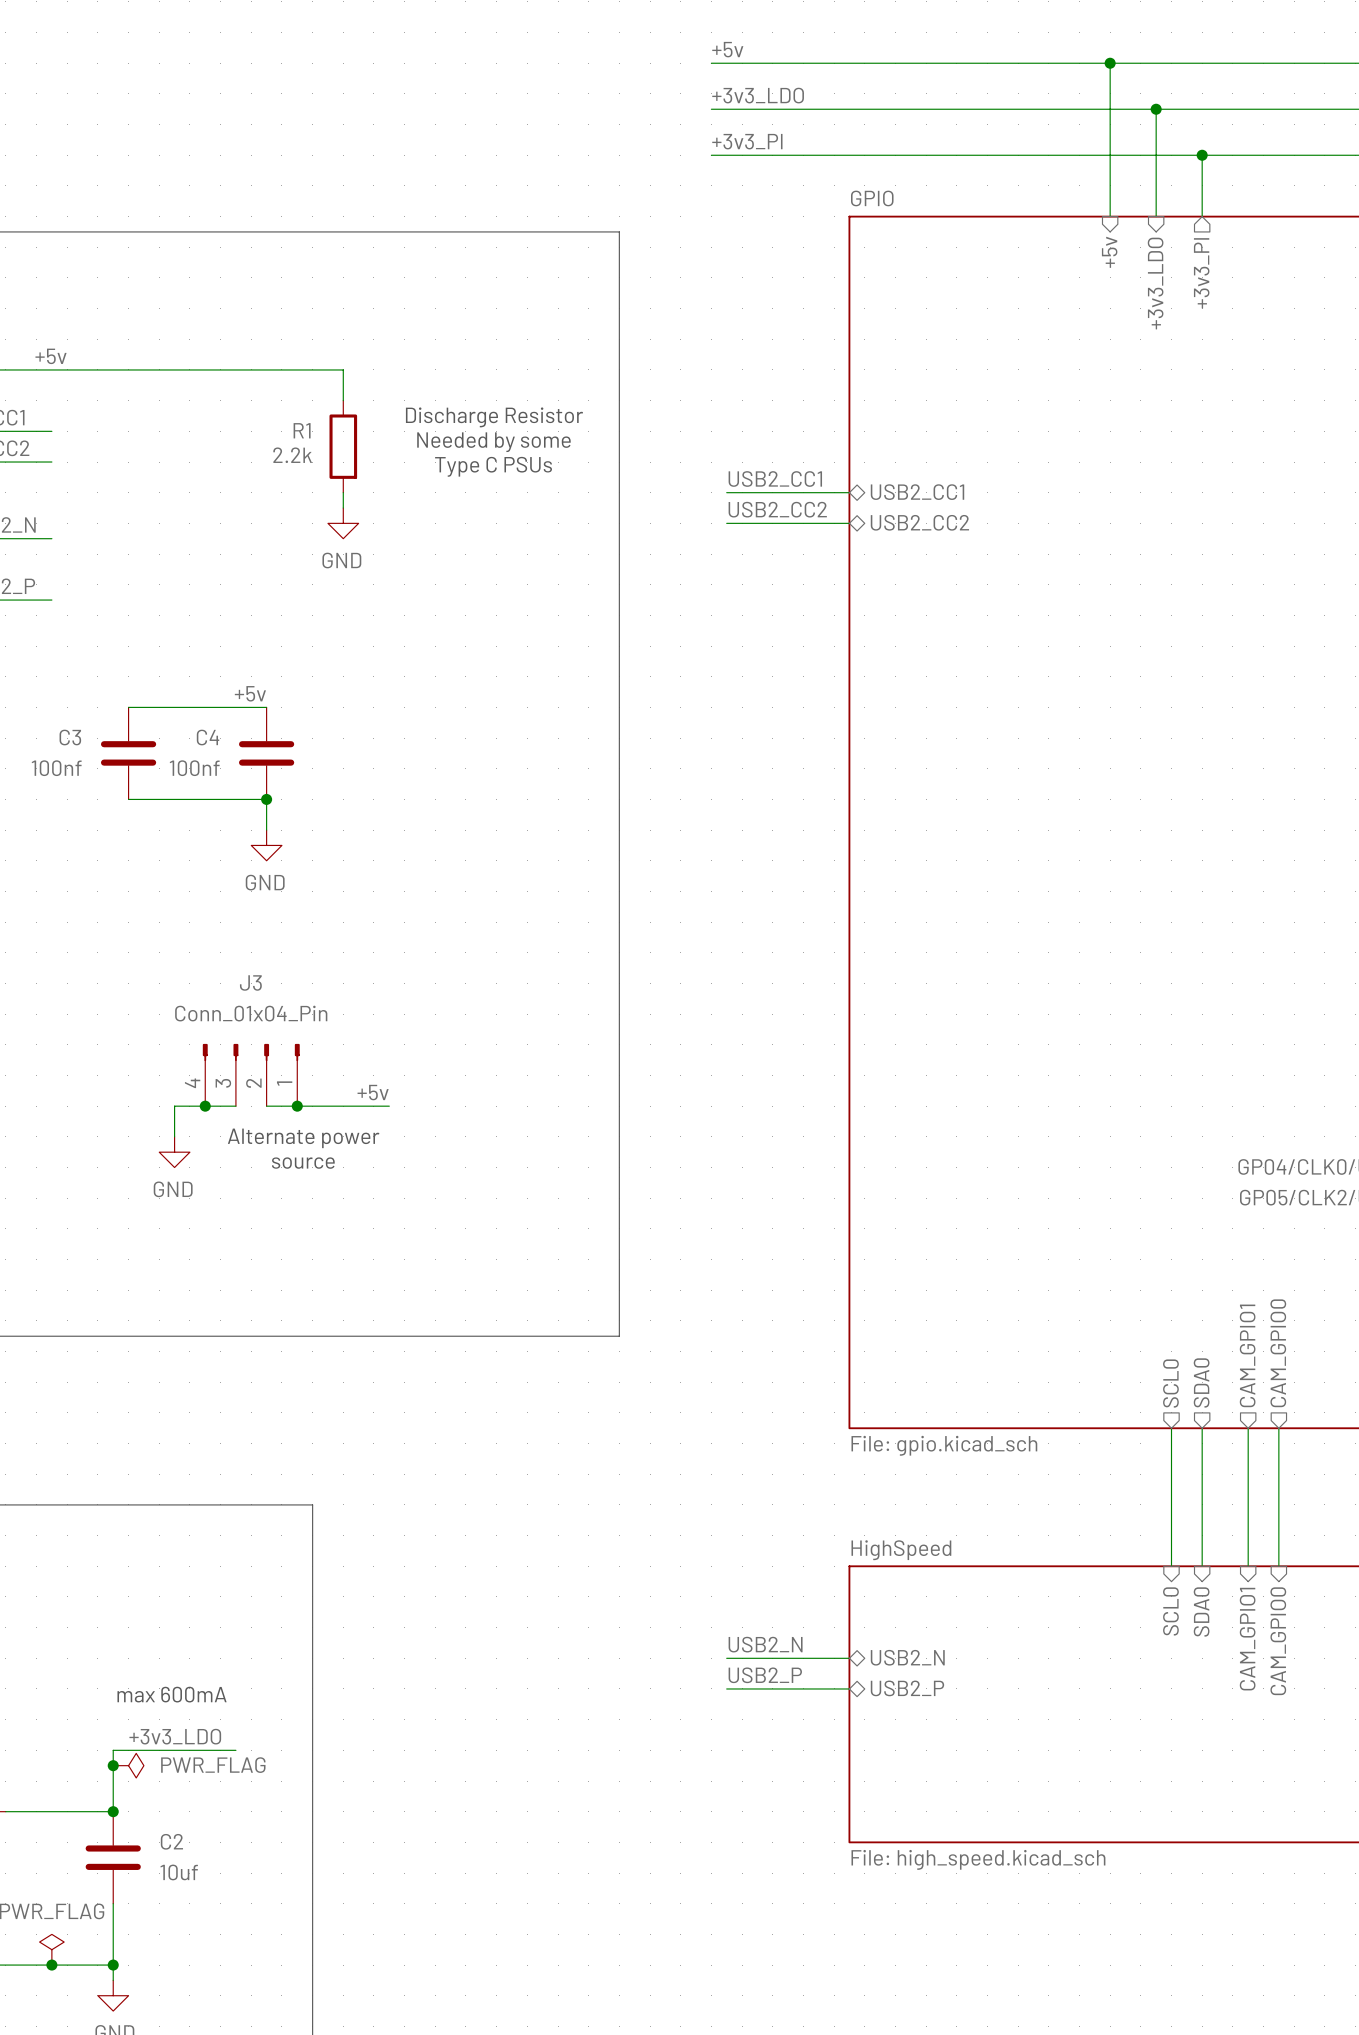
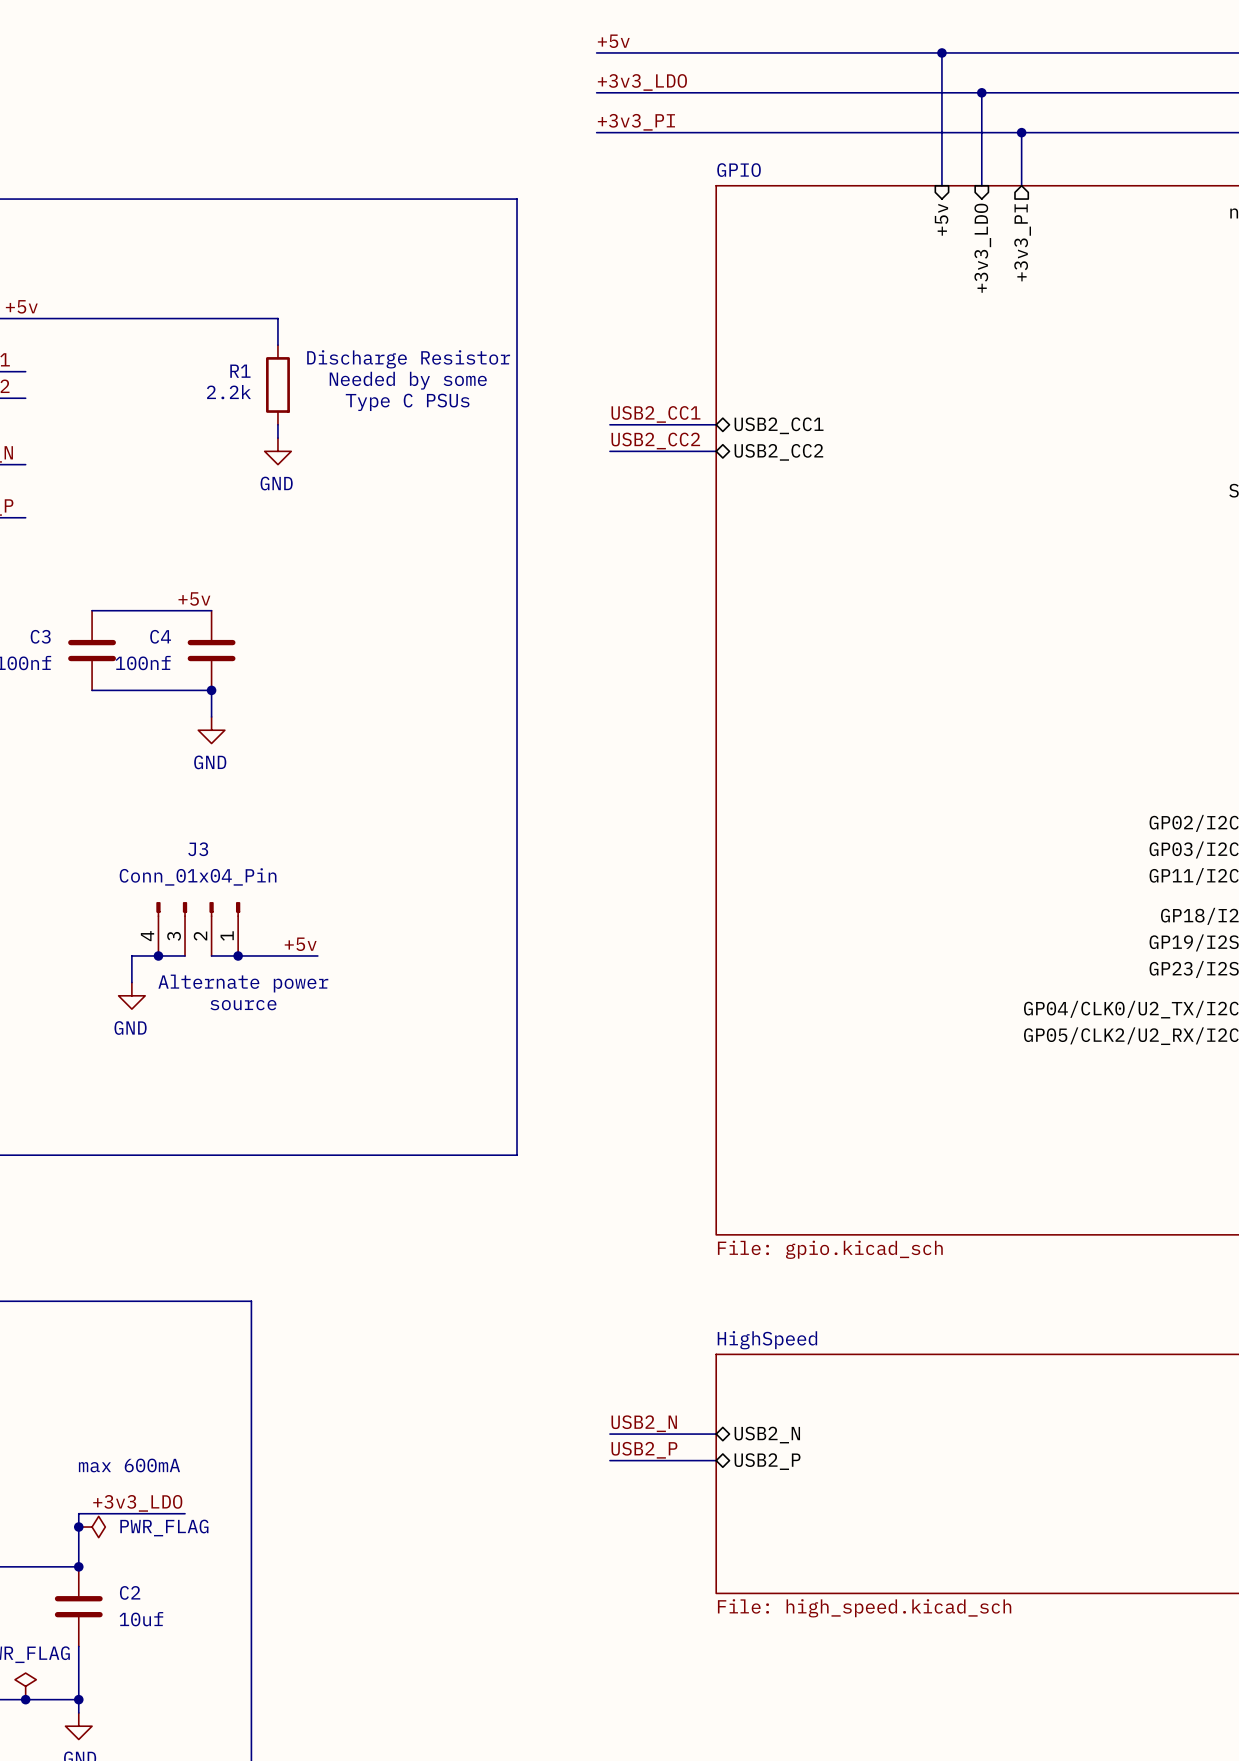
sheet pin: CAM_GPIO0 (1278, 1353) -> none
sheet pin: CAM_GPIO1 (1247, 1355) -> none
sheet pin: SDA0 (1201, 1382) -> none
sheet pin: SCL0 (1170, 1383) -> none
wire: (1171, 1428) (1171, 1566) -> none
wire: (1202, 1428) (1202, 1566) -> none
wire: (1248, 1428) (1248, 1566) -> none
wire: (1278, 1428) (1278, 1566) -> none
sheet pin: SCL0 (1170, 1611) -> none
sheet pin: SDA0 (1201, 1611) -> none
sheet pin: CAM_GPIO1 (1247, 1639) -> none
sheet pin: CAM_GPIO0 (1278, 1641) -> none

